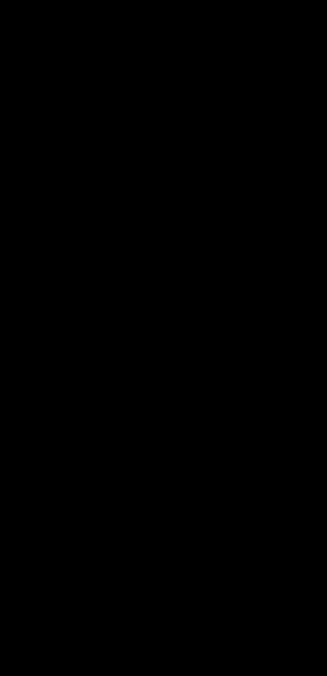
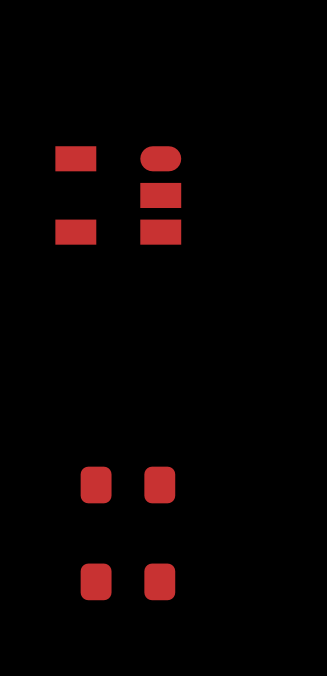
part: none -> (118, 195)
part: none -> (127, 484)
part: none -> (127, 581)

